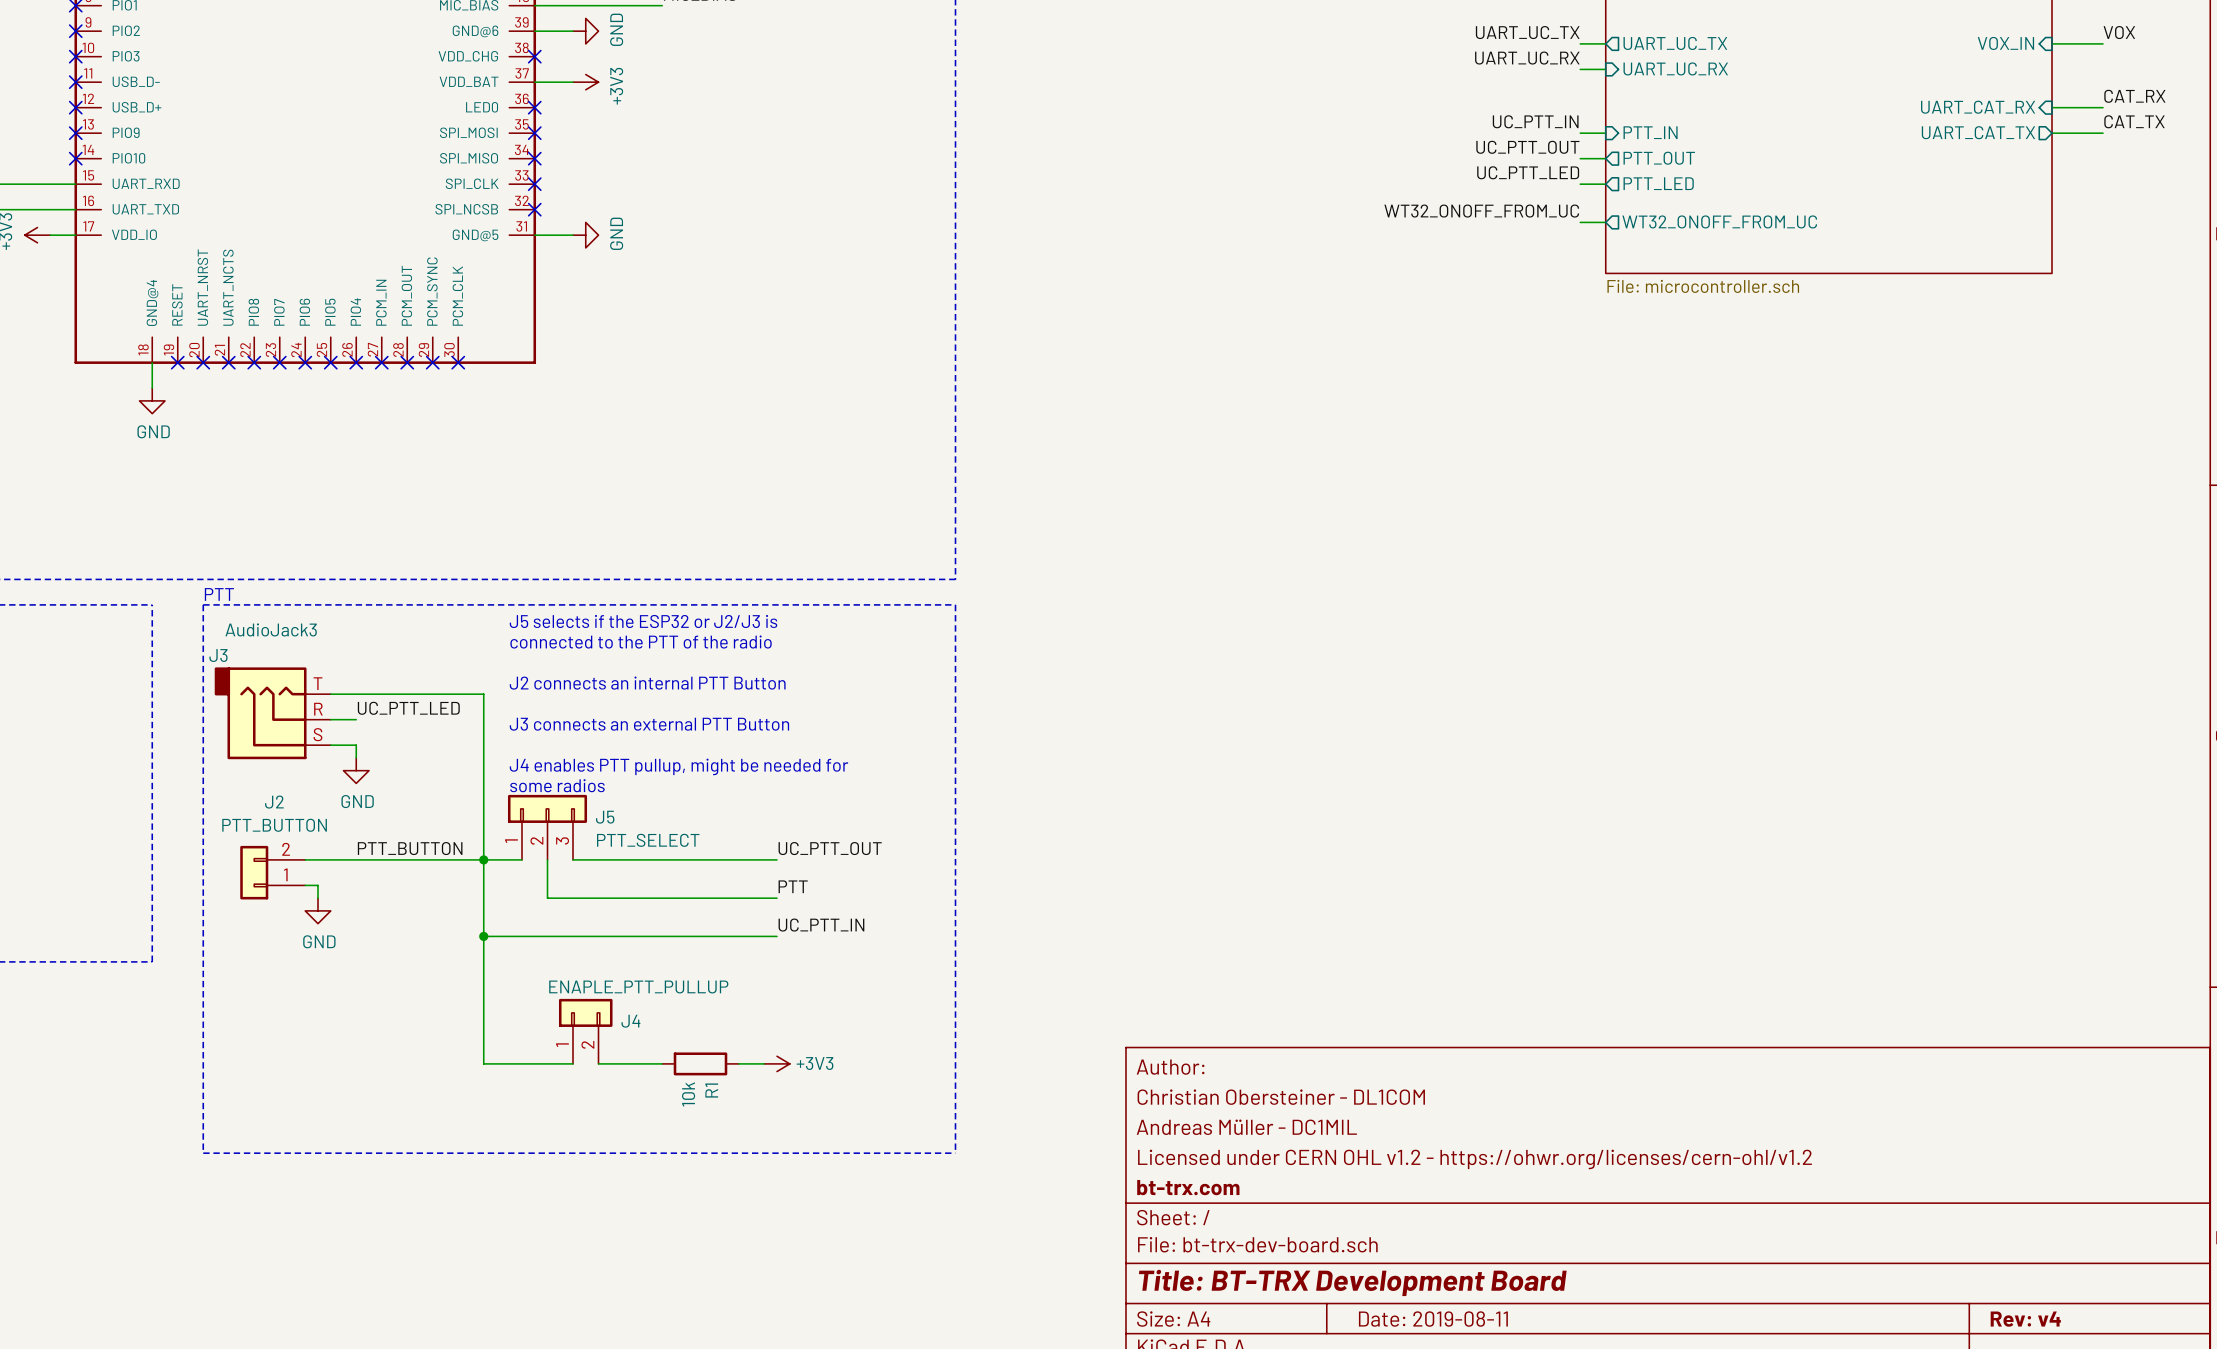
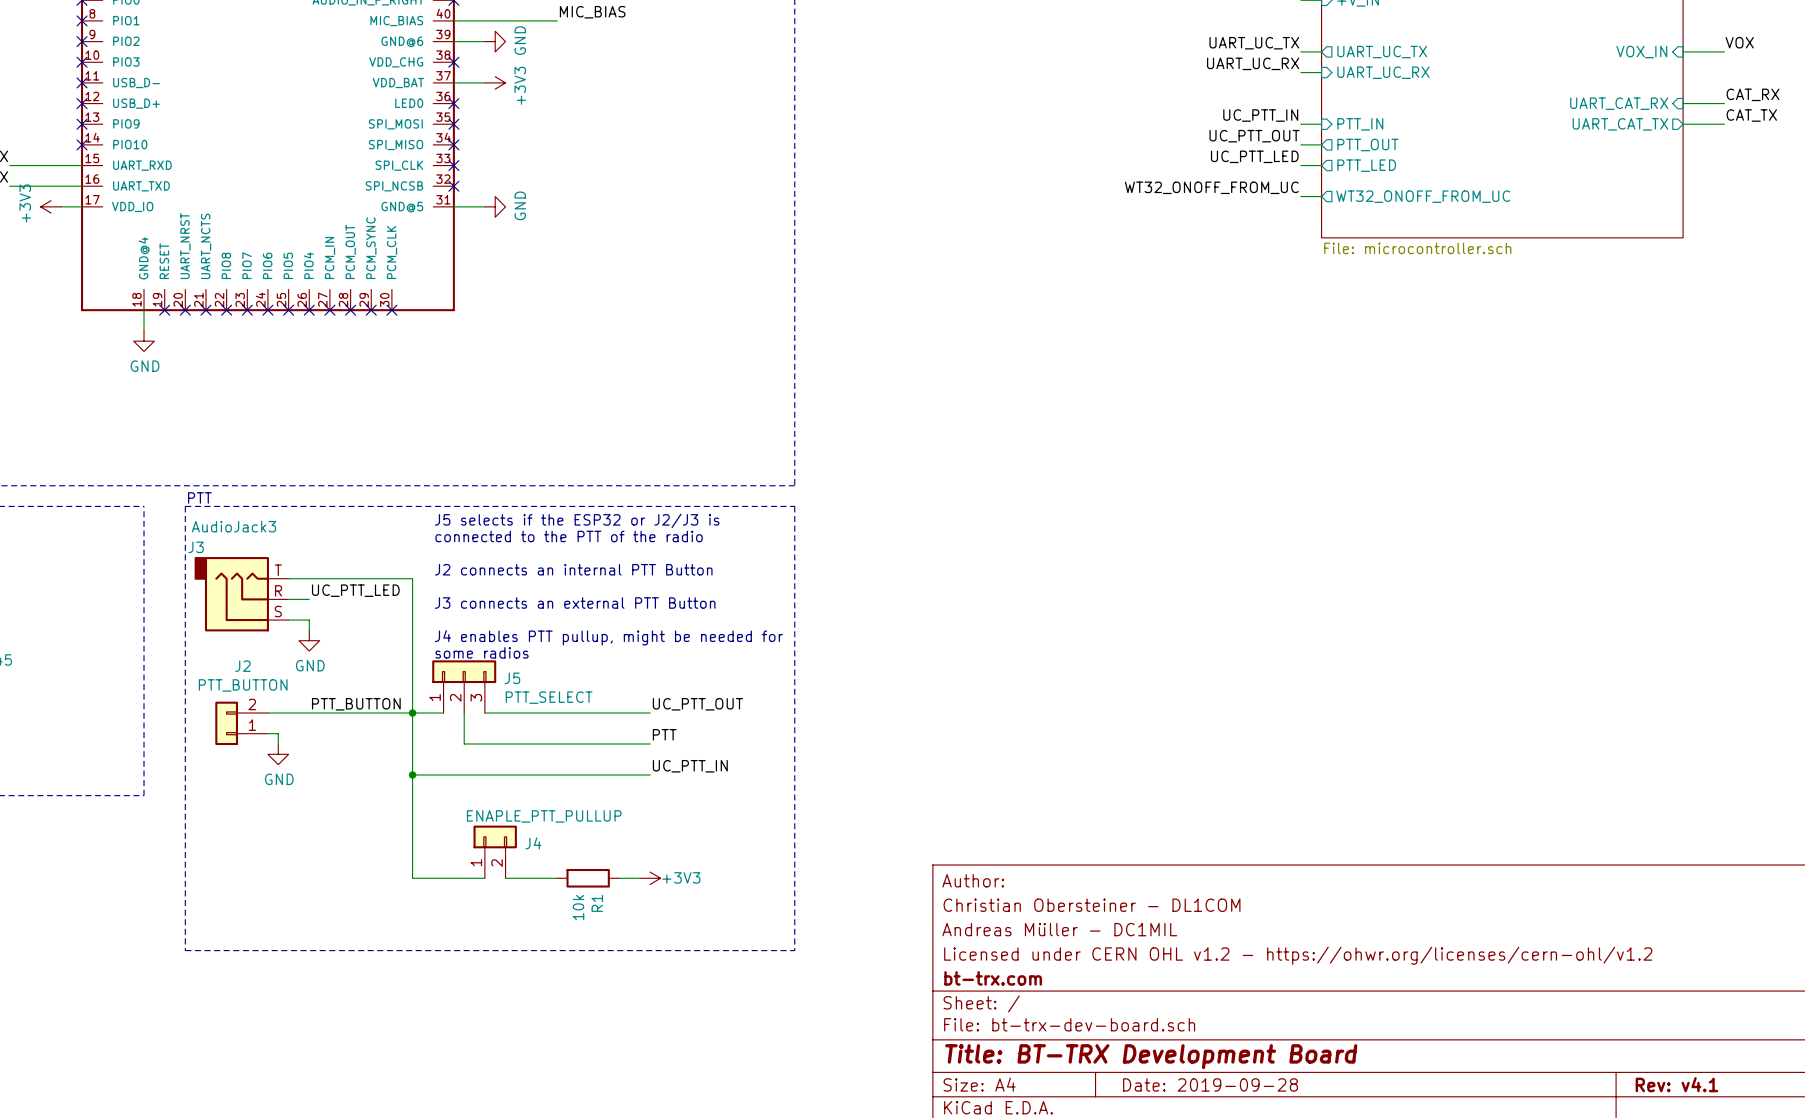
title block: Date: 2019-08-11 (1433, 1319) -> Date: 2019-09-28 (1210, 1084)
title block: Rev: v4 (2025, 1319) -> Rev: v4.1 (1676, 1084)

